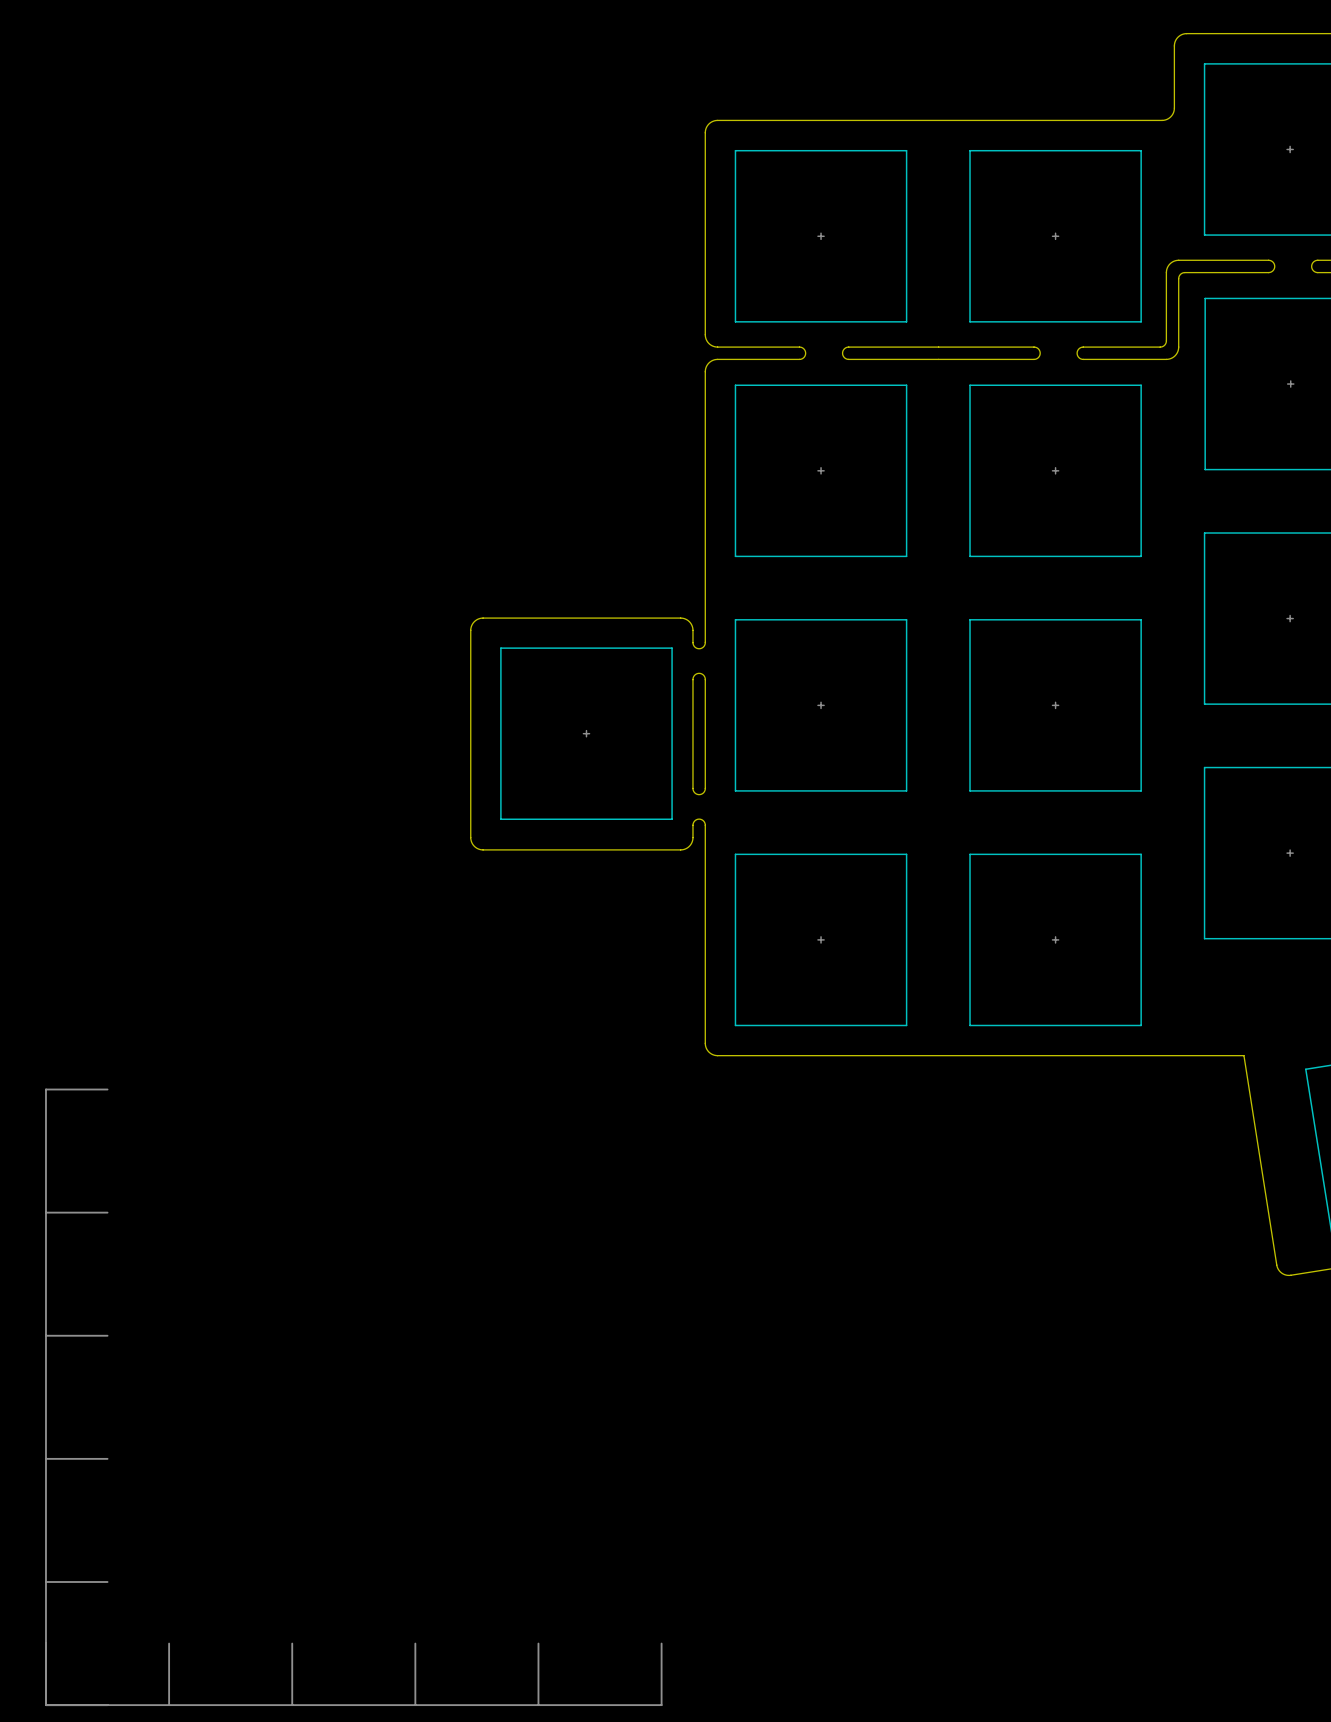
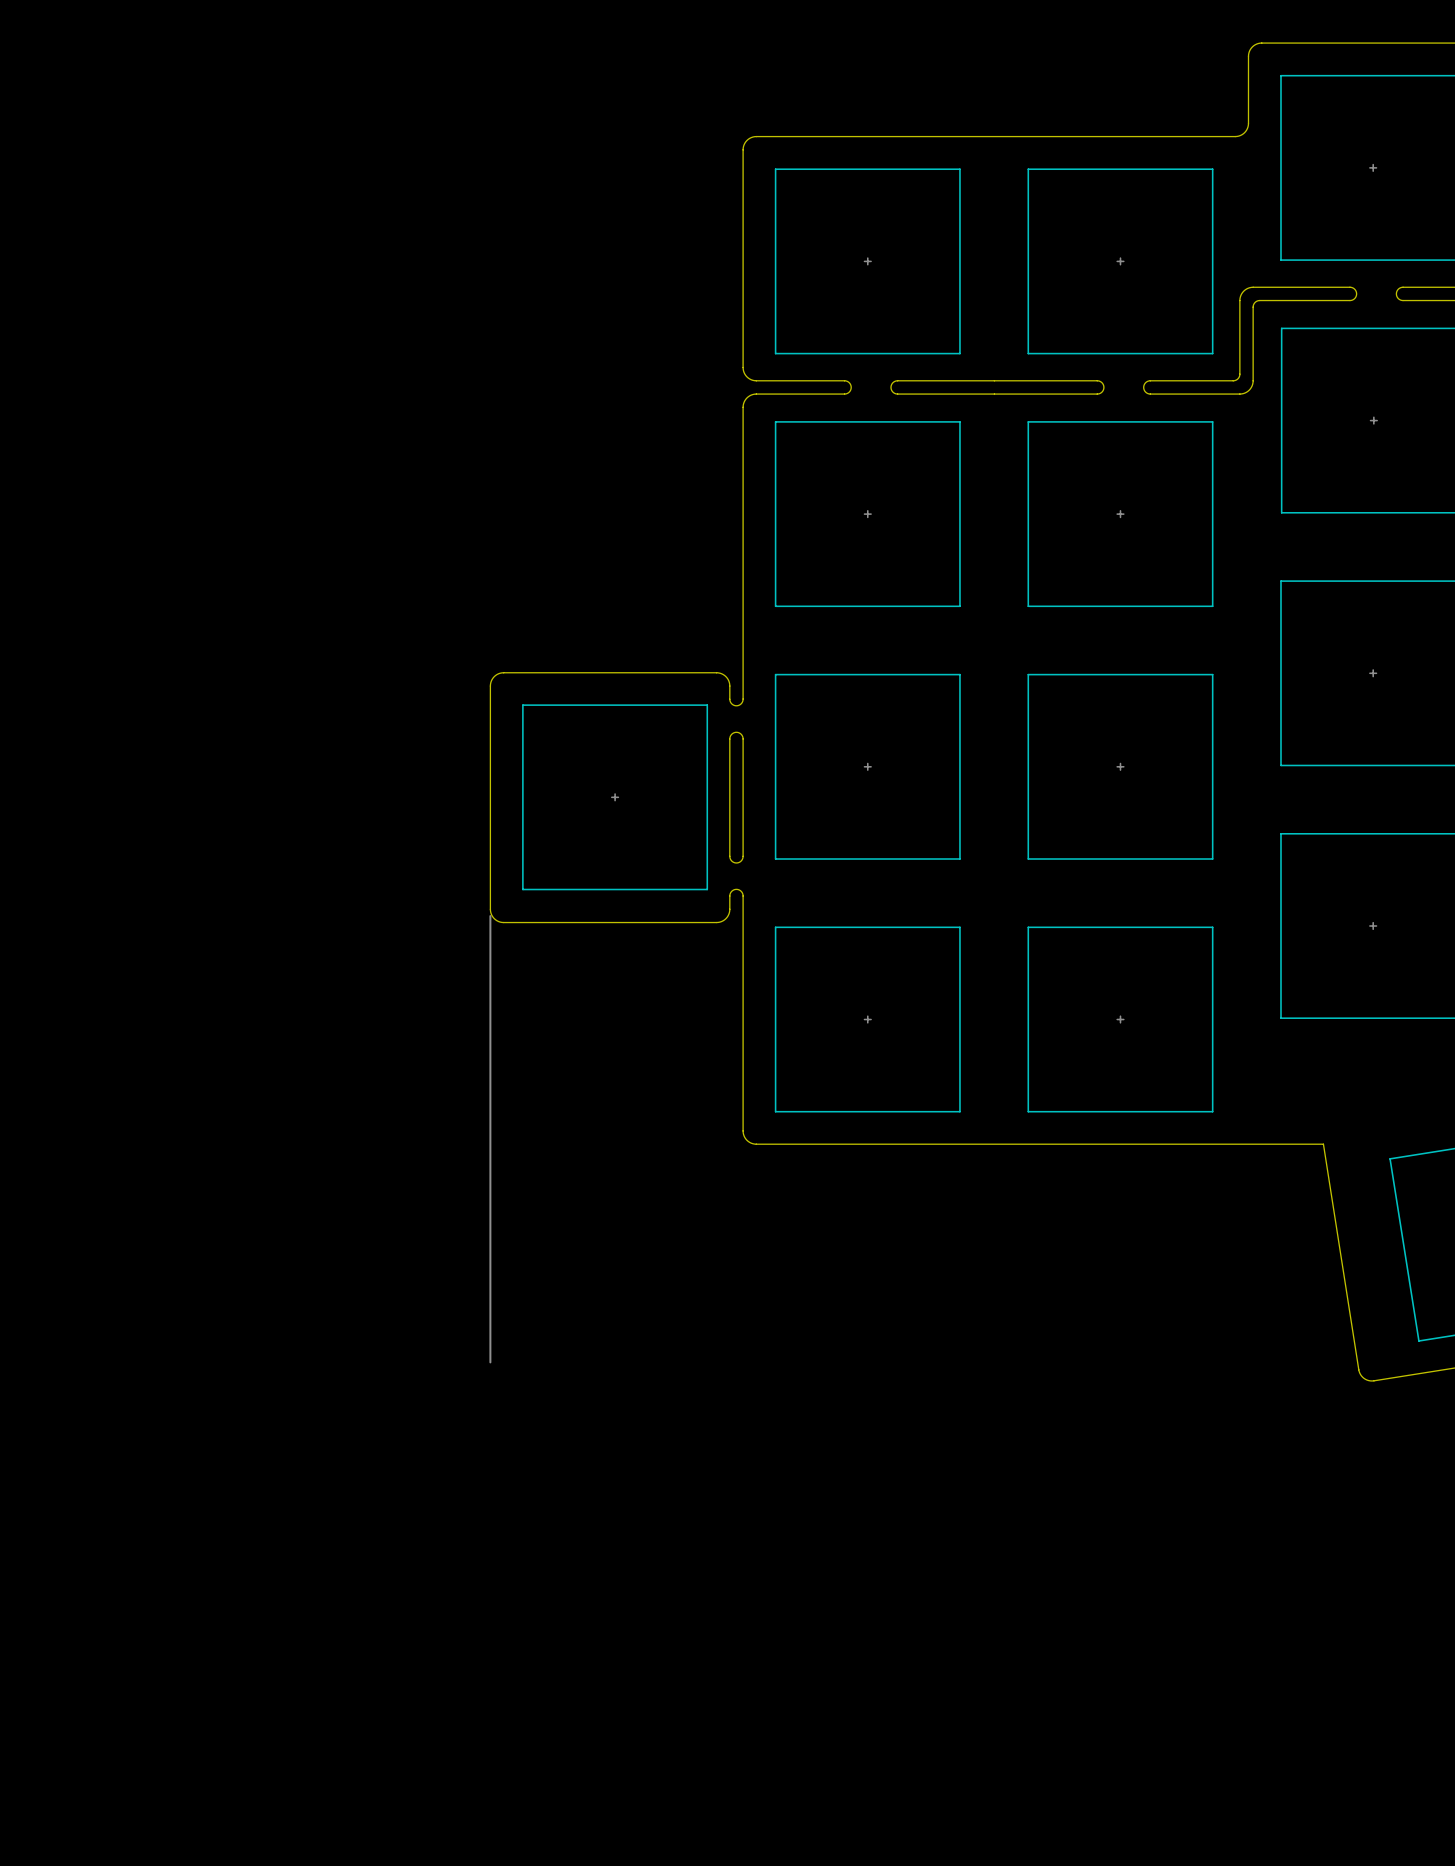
line: none -> (490, 916) (490, 1362)
line: (107, 1089) (45, 1089) (45, 1705) (661, 1705) (661, 1643) -> none
line: (45, 1212) (107, 1212) -> none
line: (45, 1335) (107, 1335) -> none
line: (45, 1458) (107, 1458) -> none
line: (45, 1581) (107, 1581) -> none
line: (169, 1643) (169, 1705) -> none
line: (292, 1643) (292, 1705) -> none
line: (415, 1643) (415, 1705) -> none
line: (538, 1643) (538, 1705) -> none

